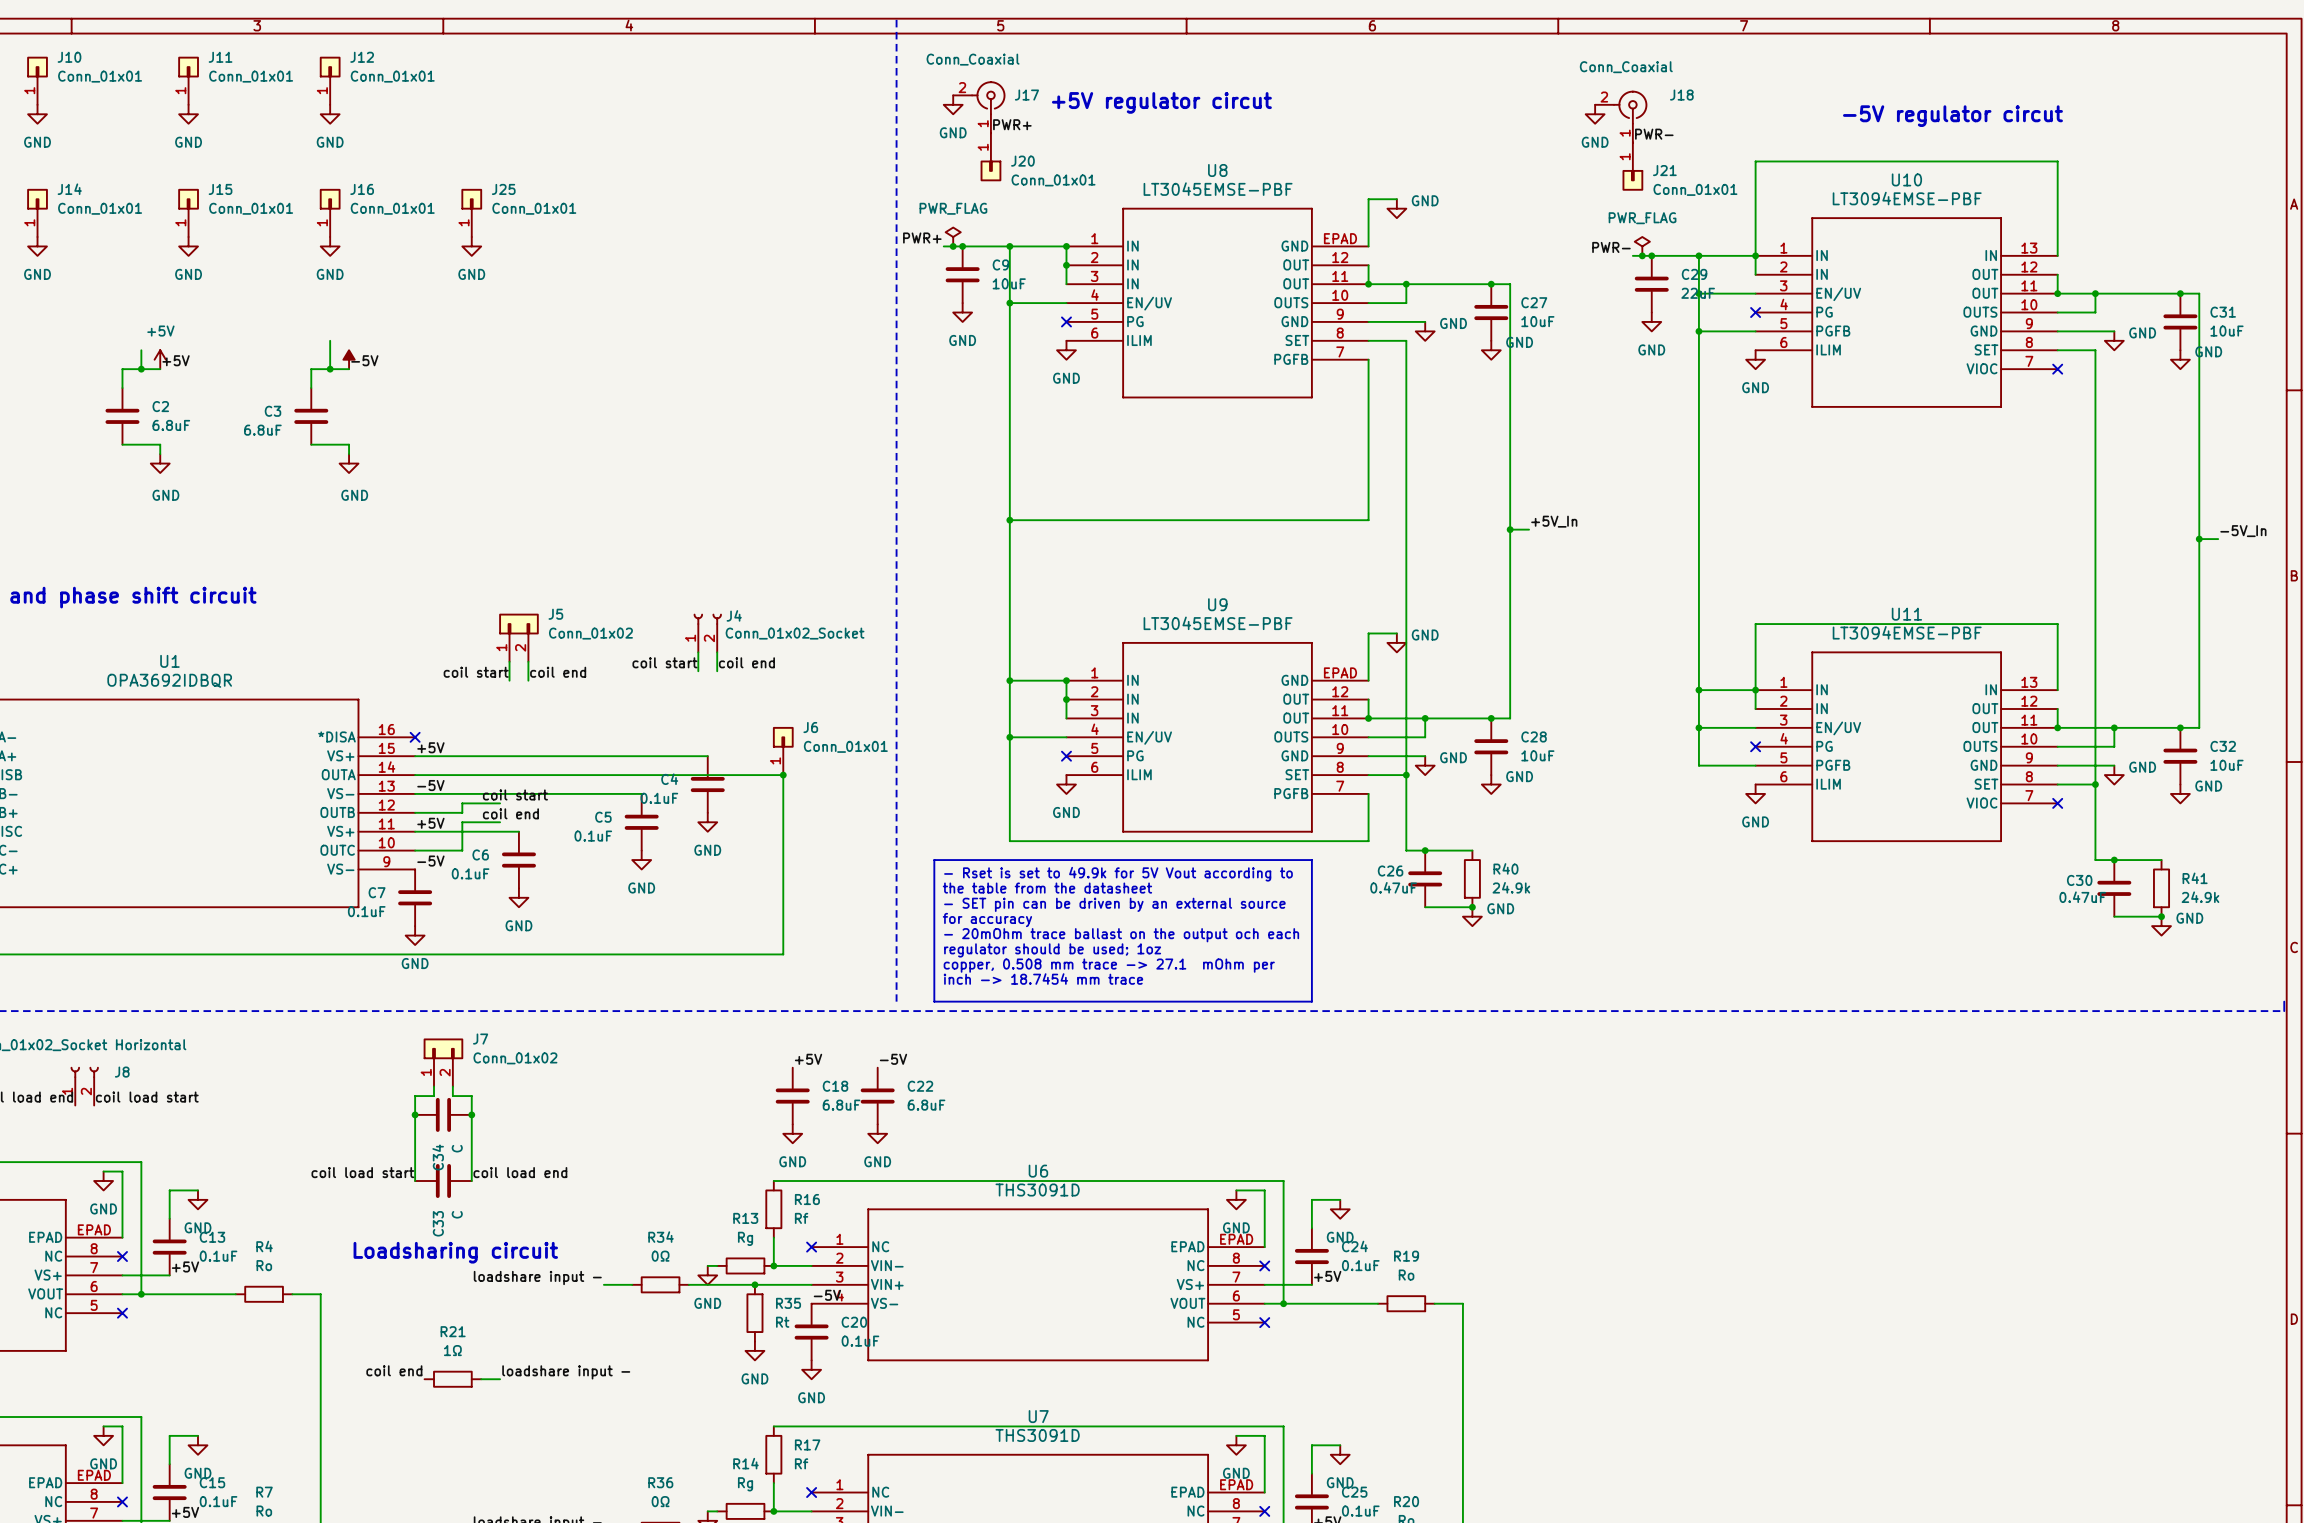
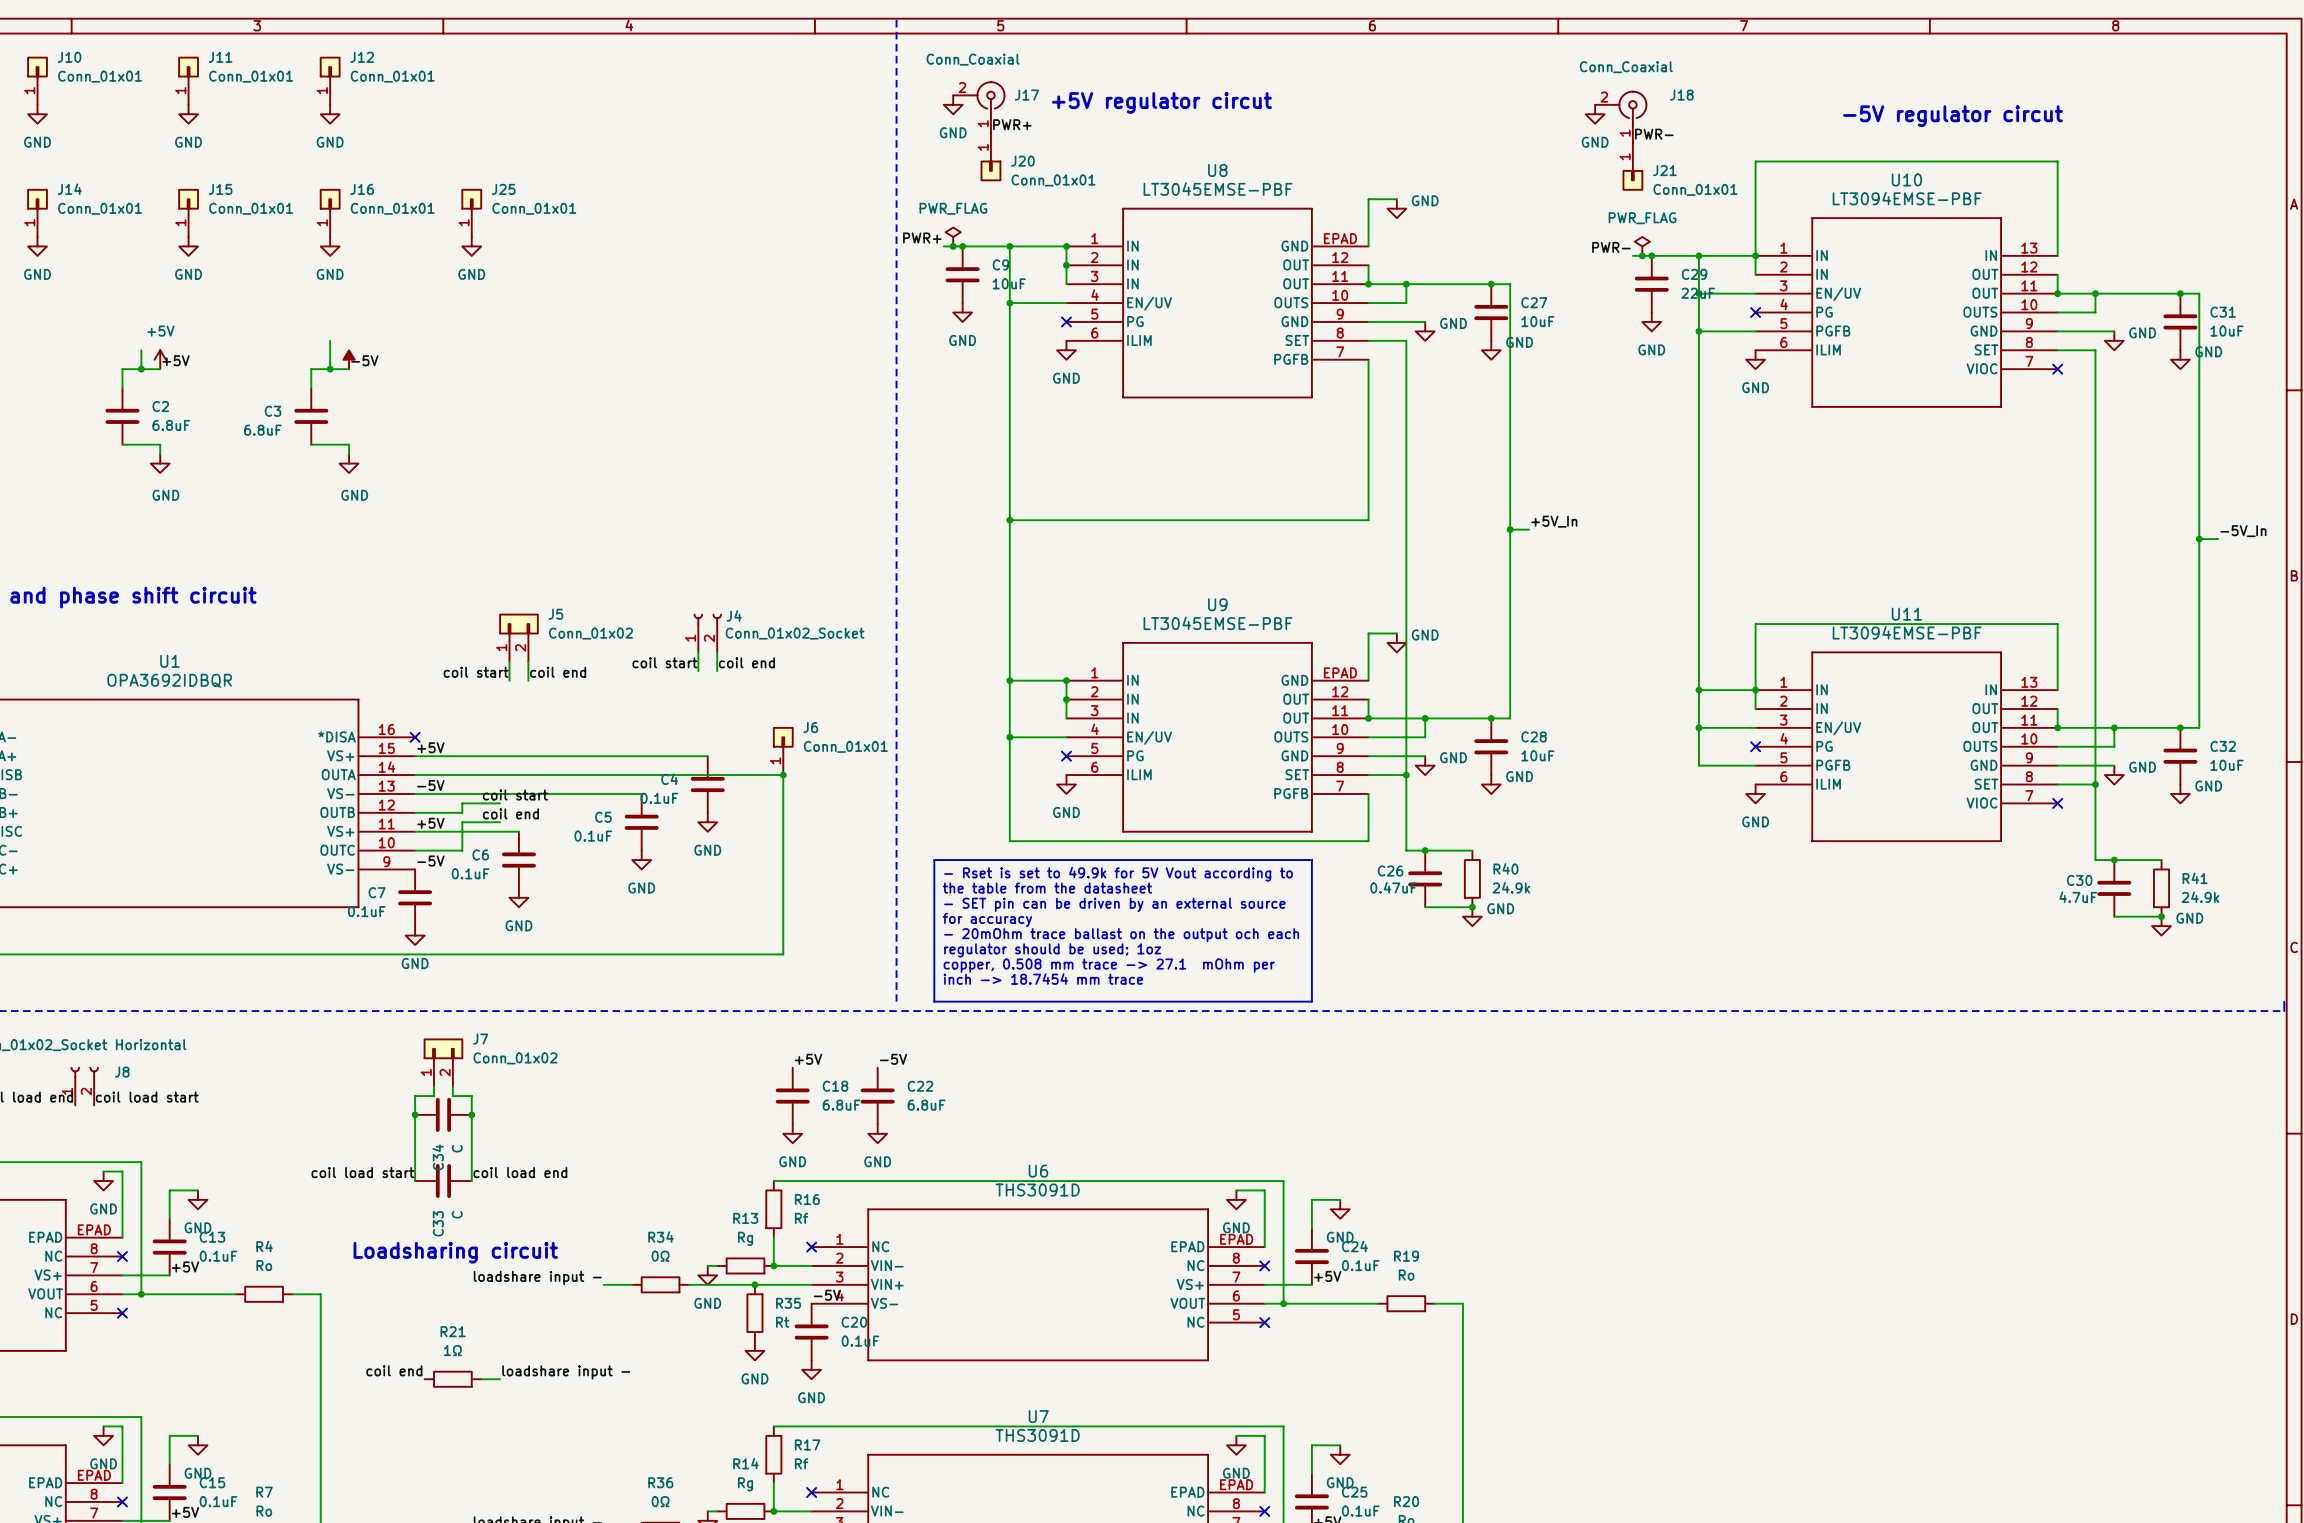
C30 value: 0.47uF (2082, 897) -> 4.7uF (2078, 897)

